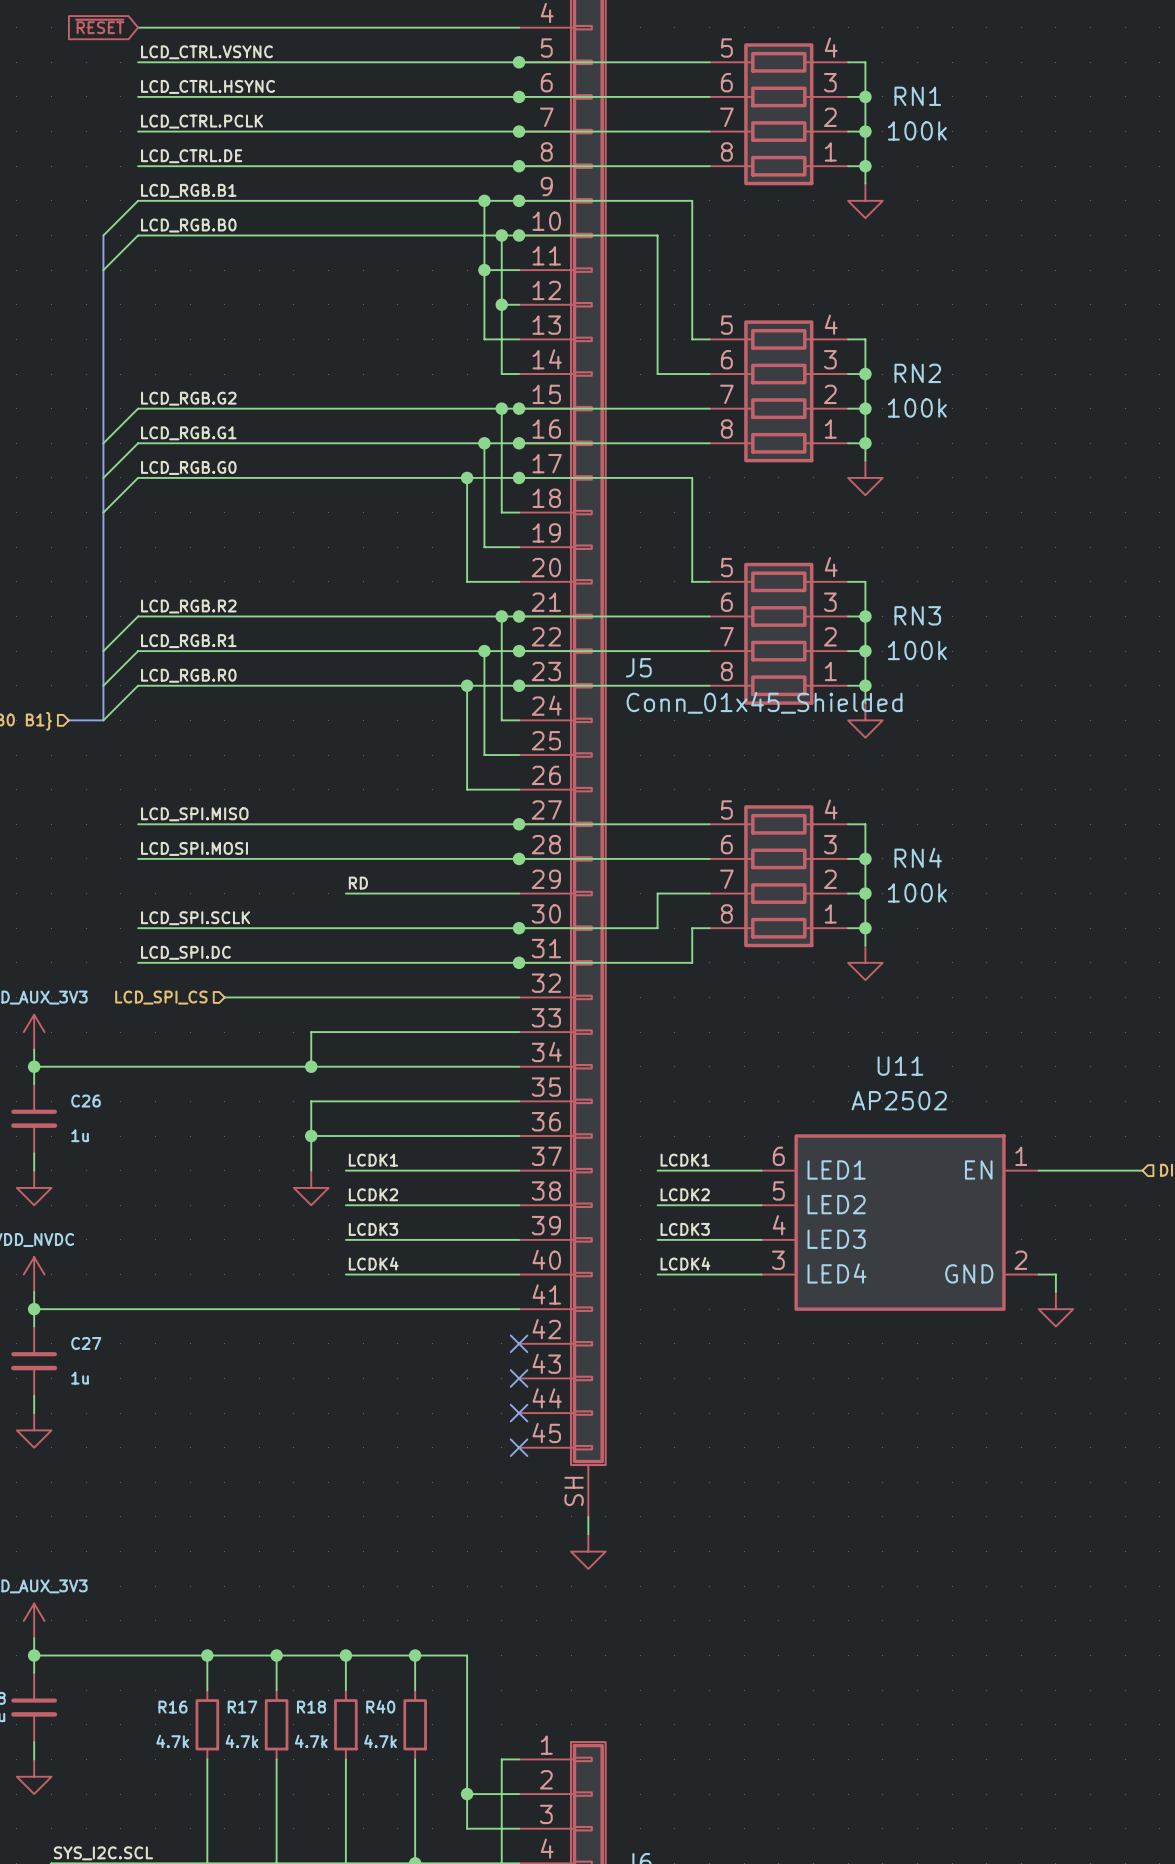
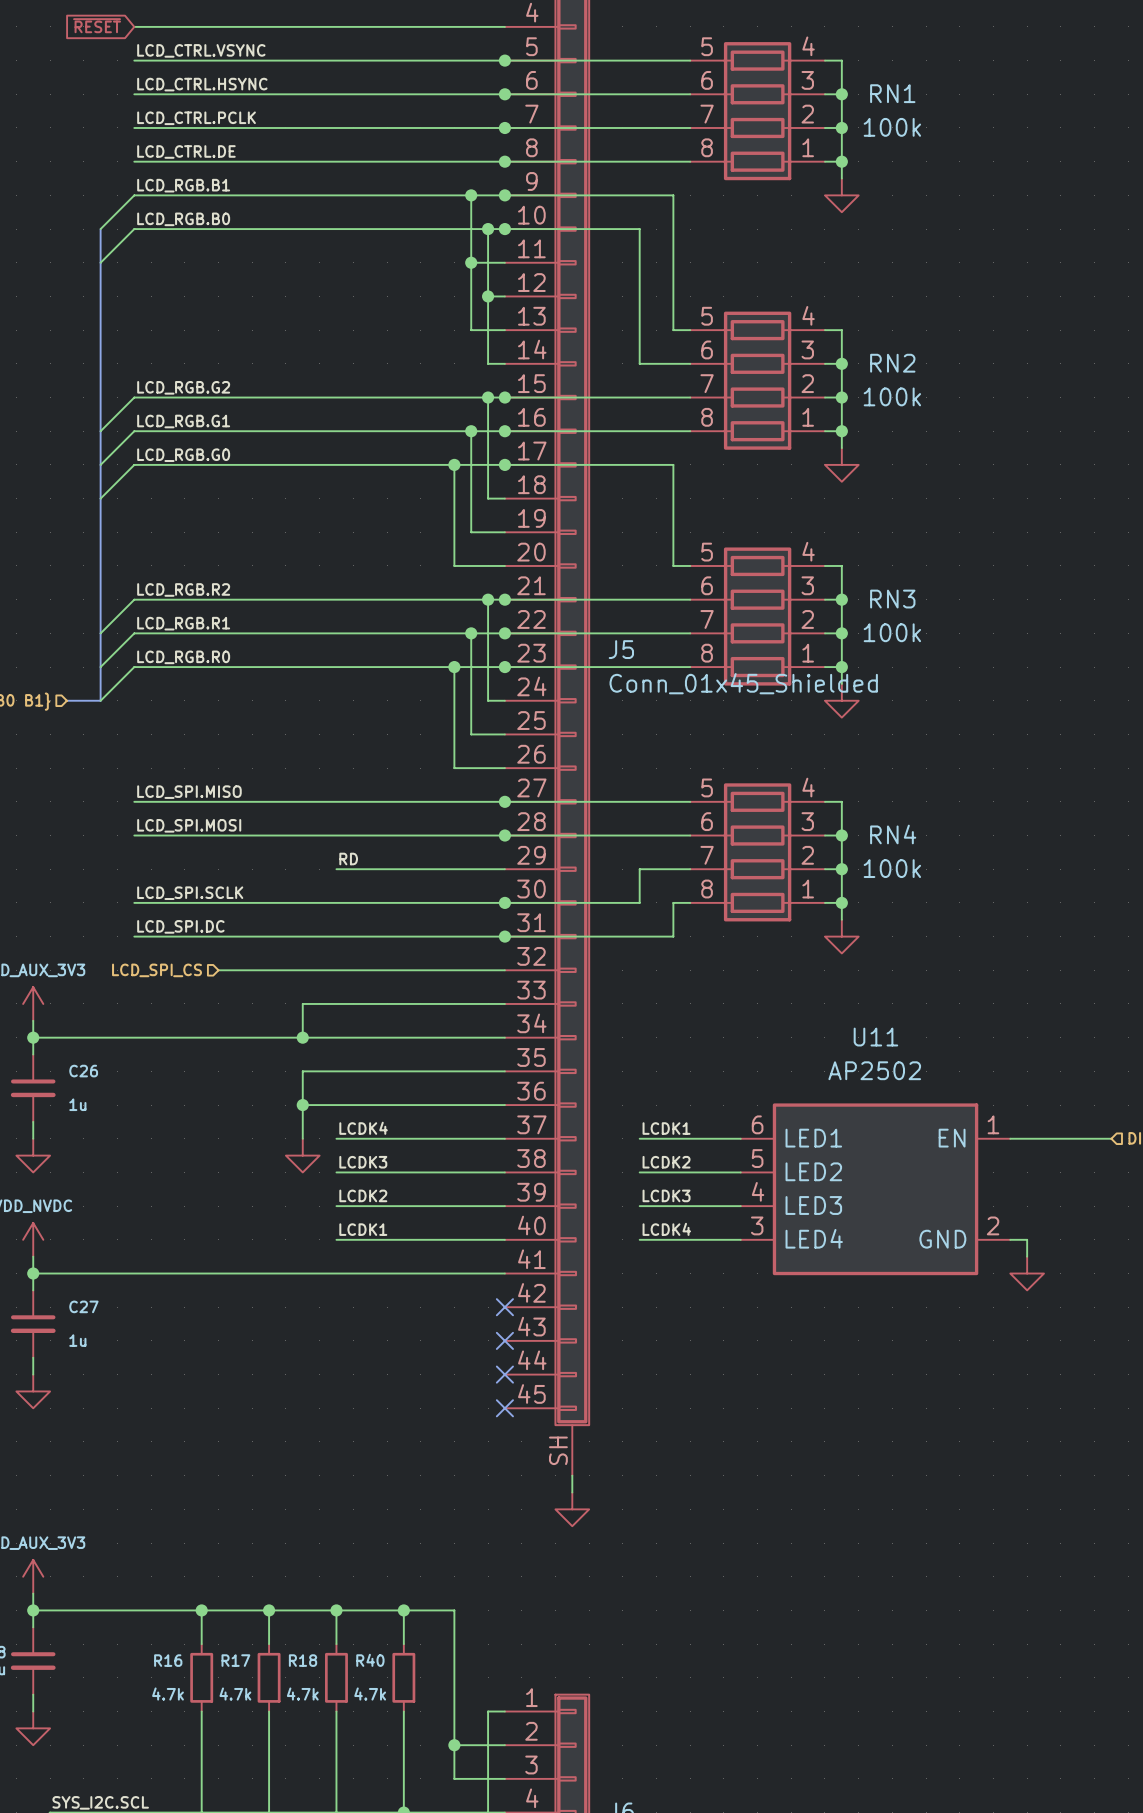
label: LCDK1 (373, 1160) -> LCDK4 (363, 1128)
label: LCDK2 (373, 1194) -> LCDK3 (363, 1162)
label: LCDK3 (373, 1229) -> LCDK2 (363, 1195)
label: LCDK4 (373, 1263) -> LCDK1 (363, 1229)

